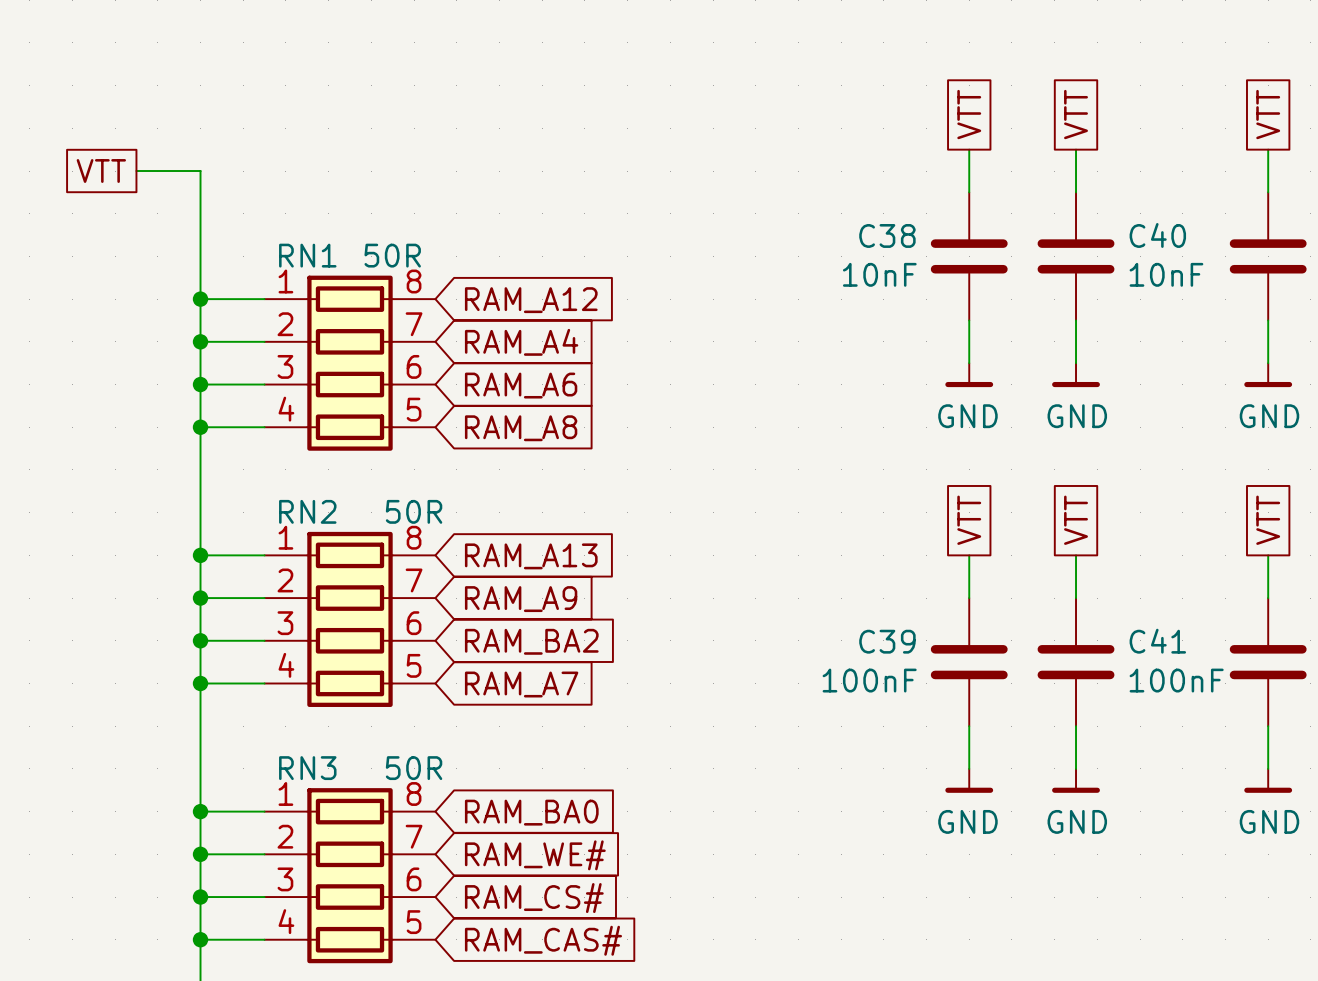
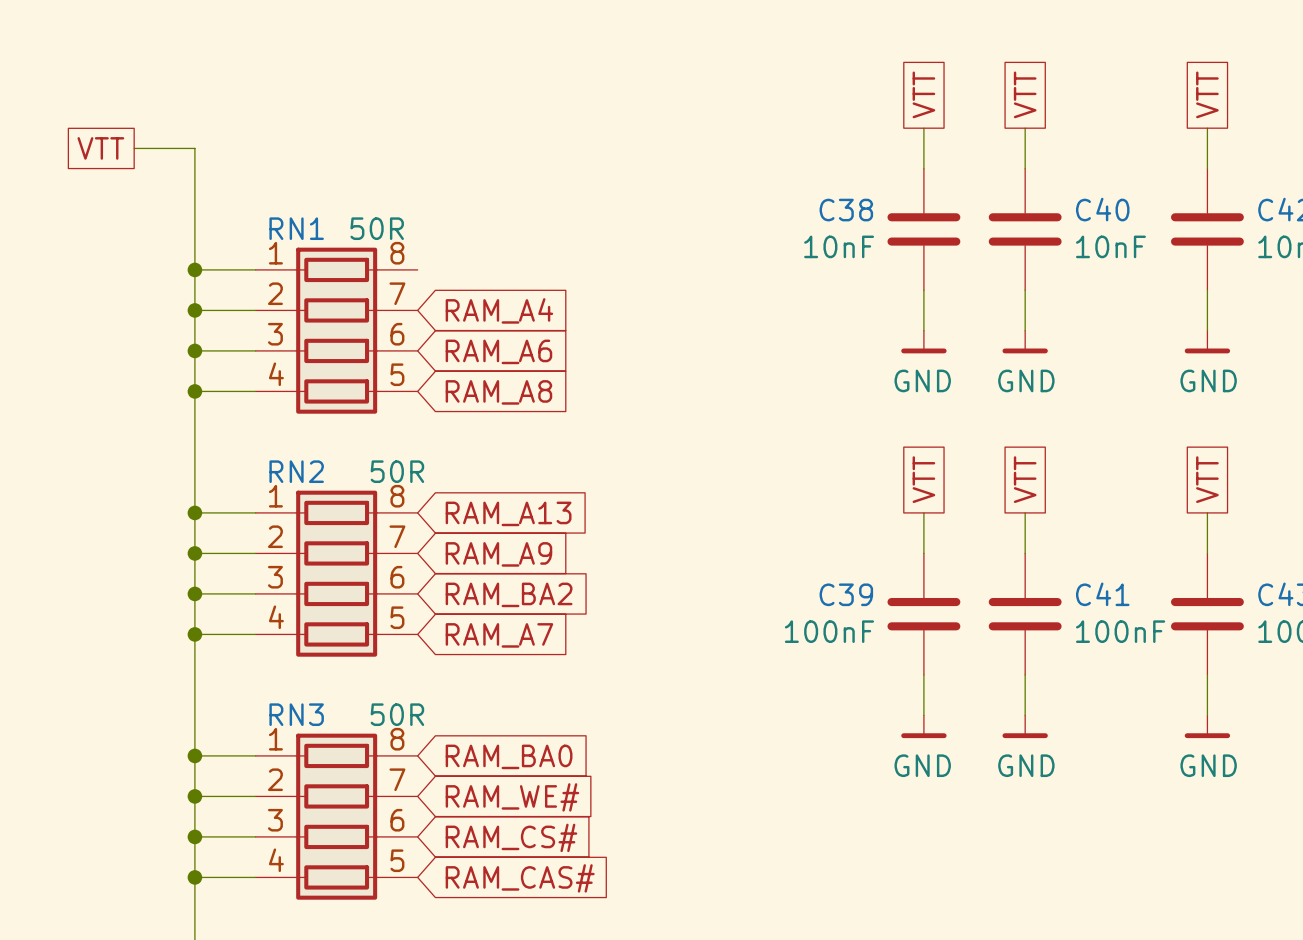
global label: RAM_A12 (531, 300) -> none

